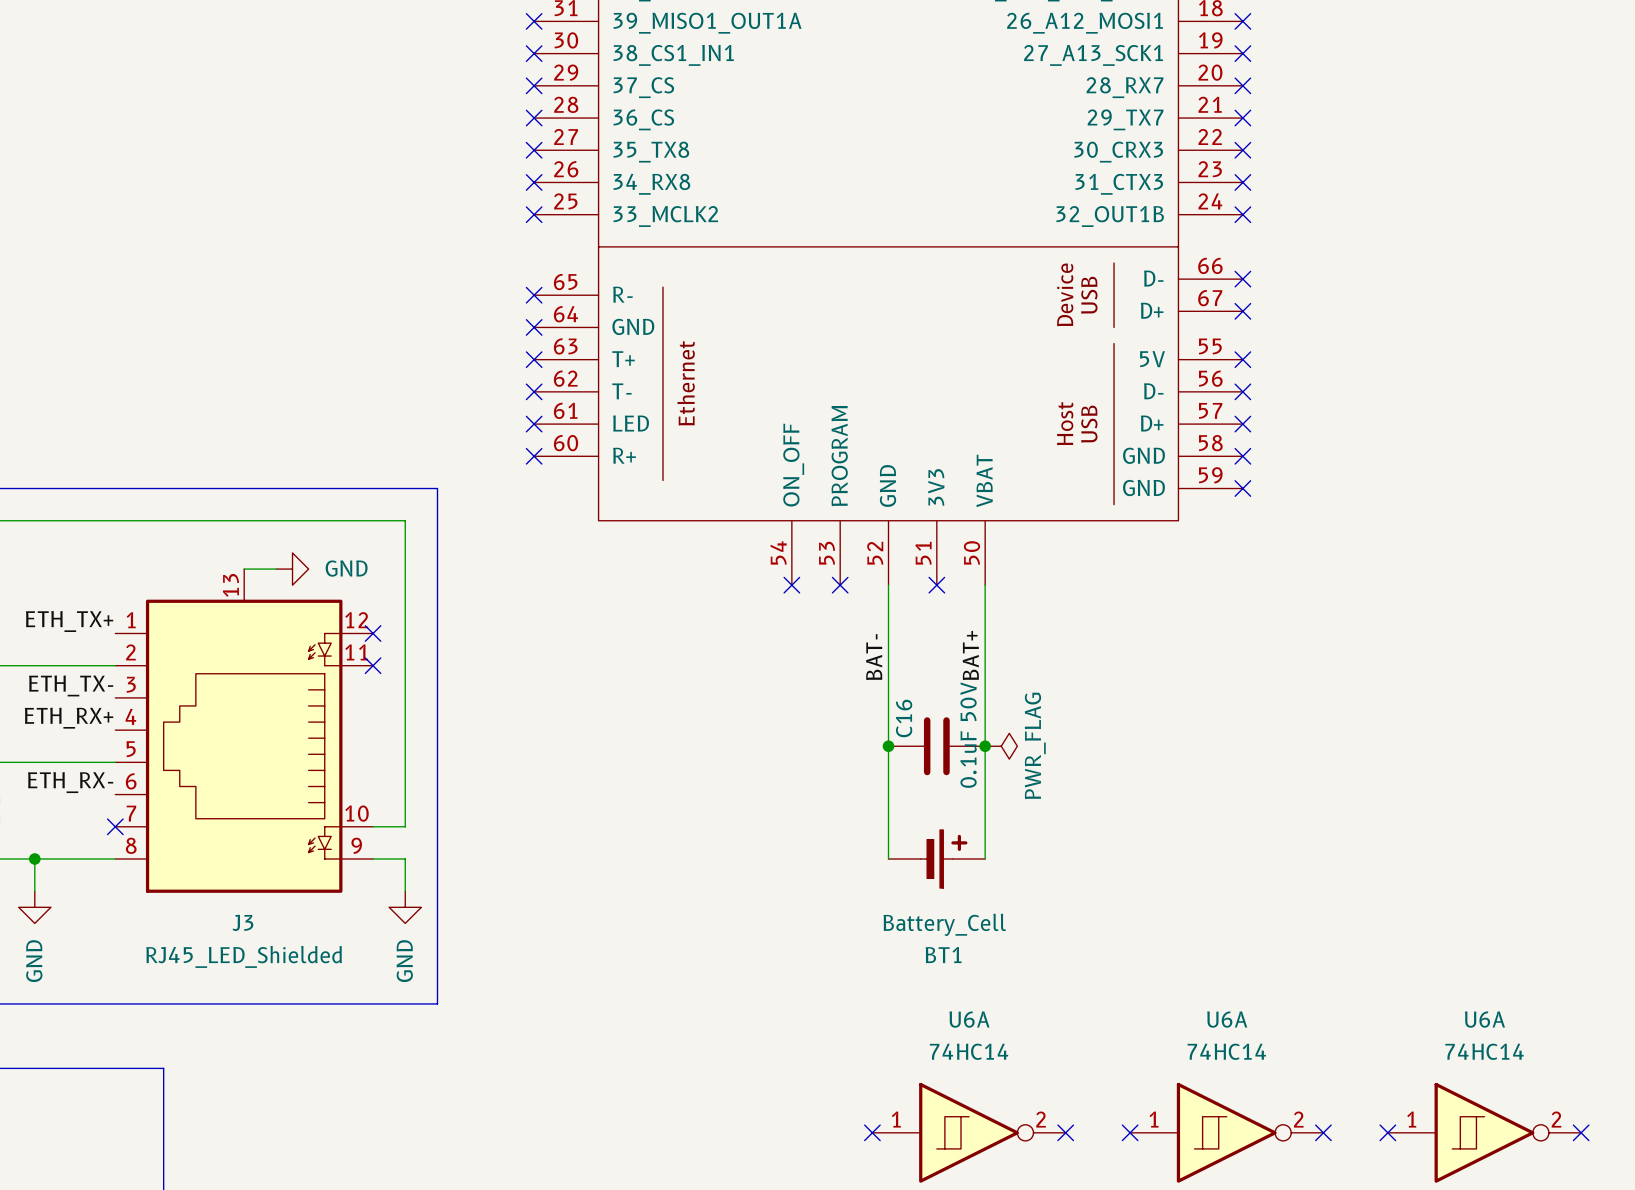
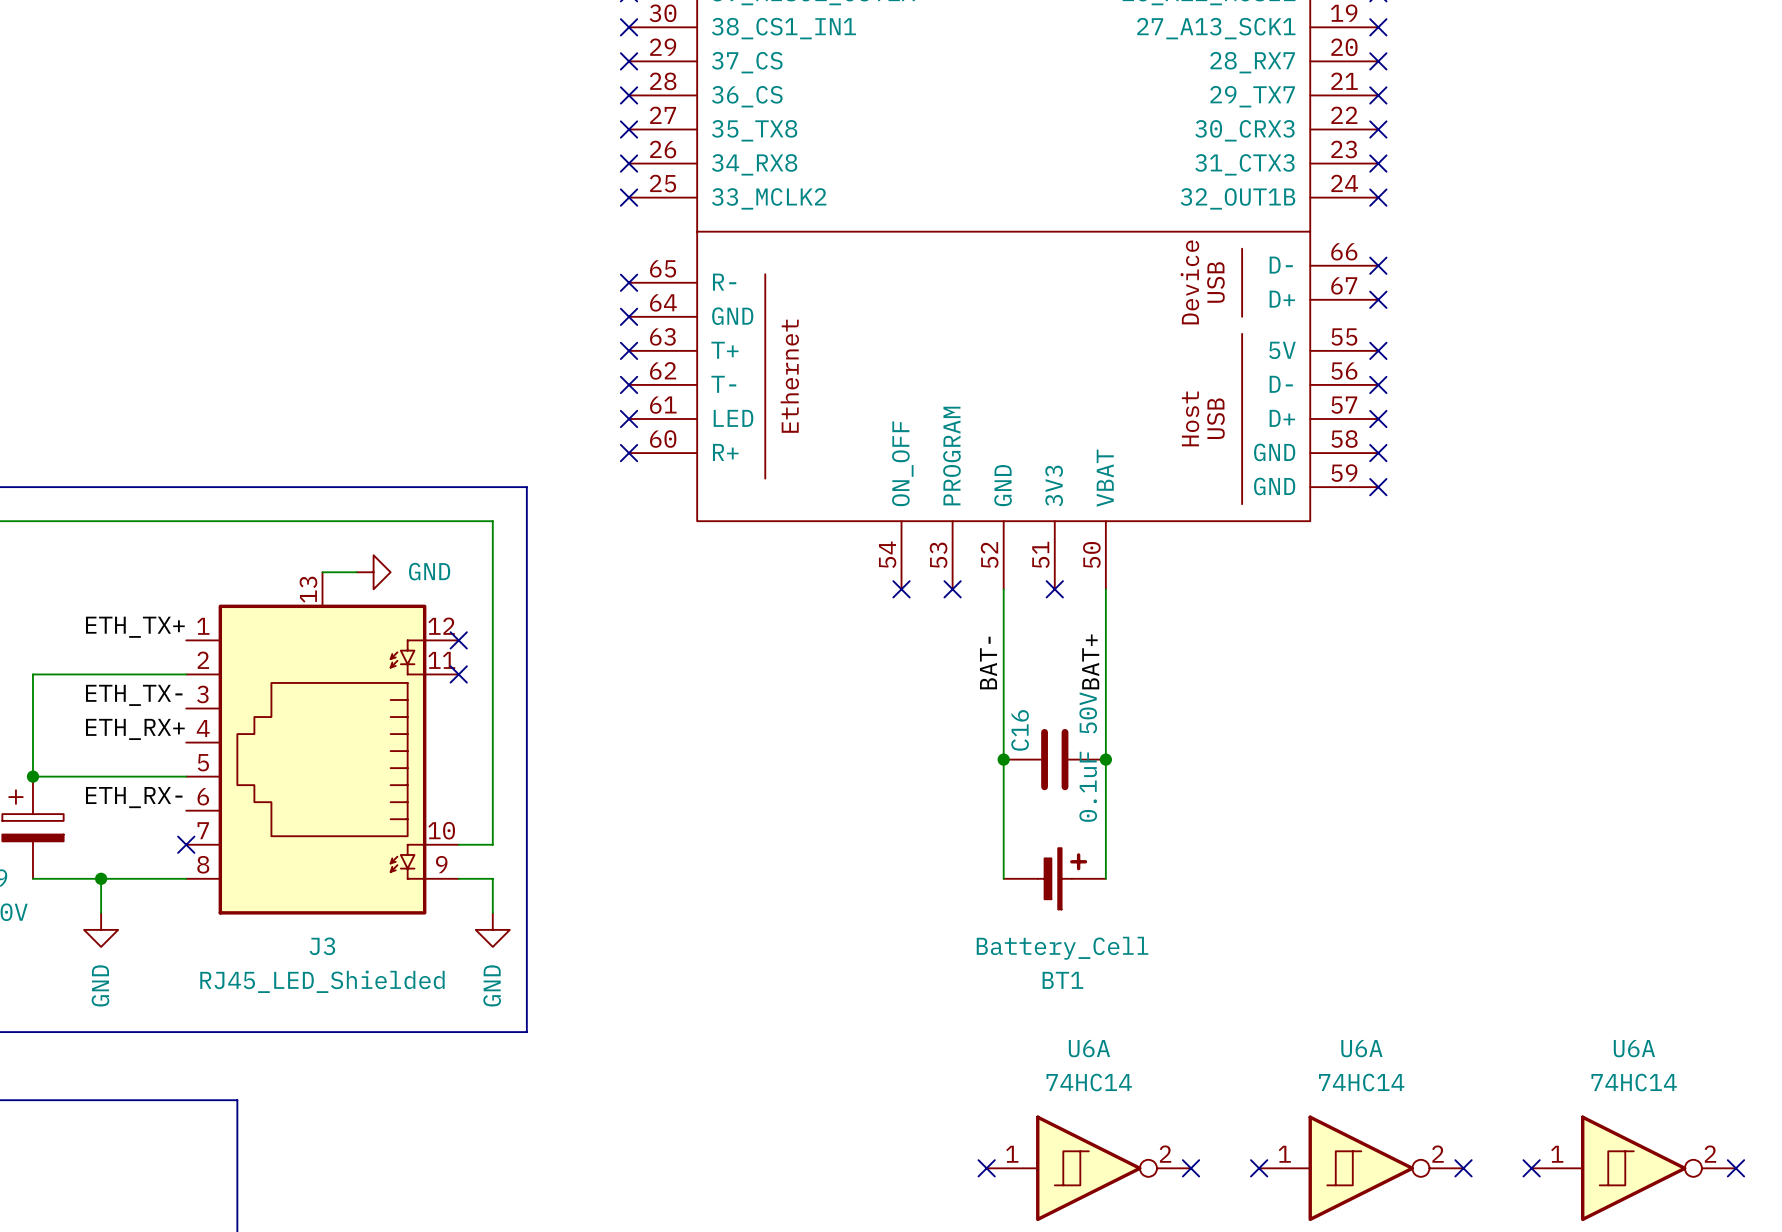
power symbol: PWR_FLAG (1001, 746) -> none

